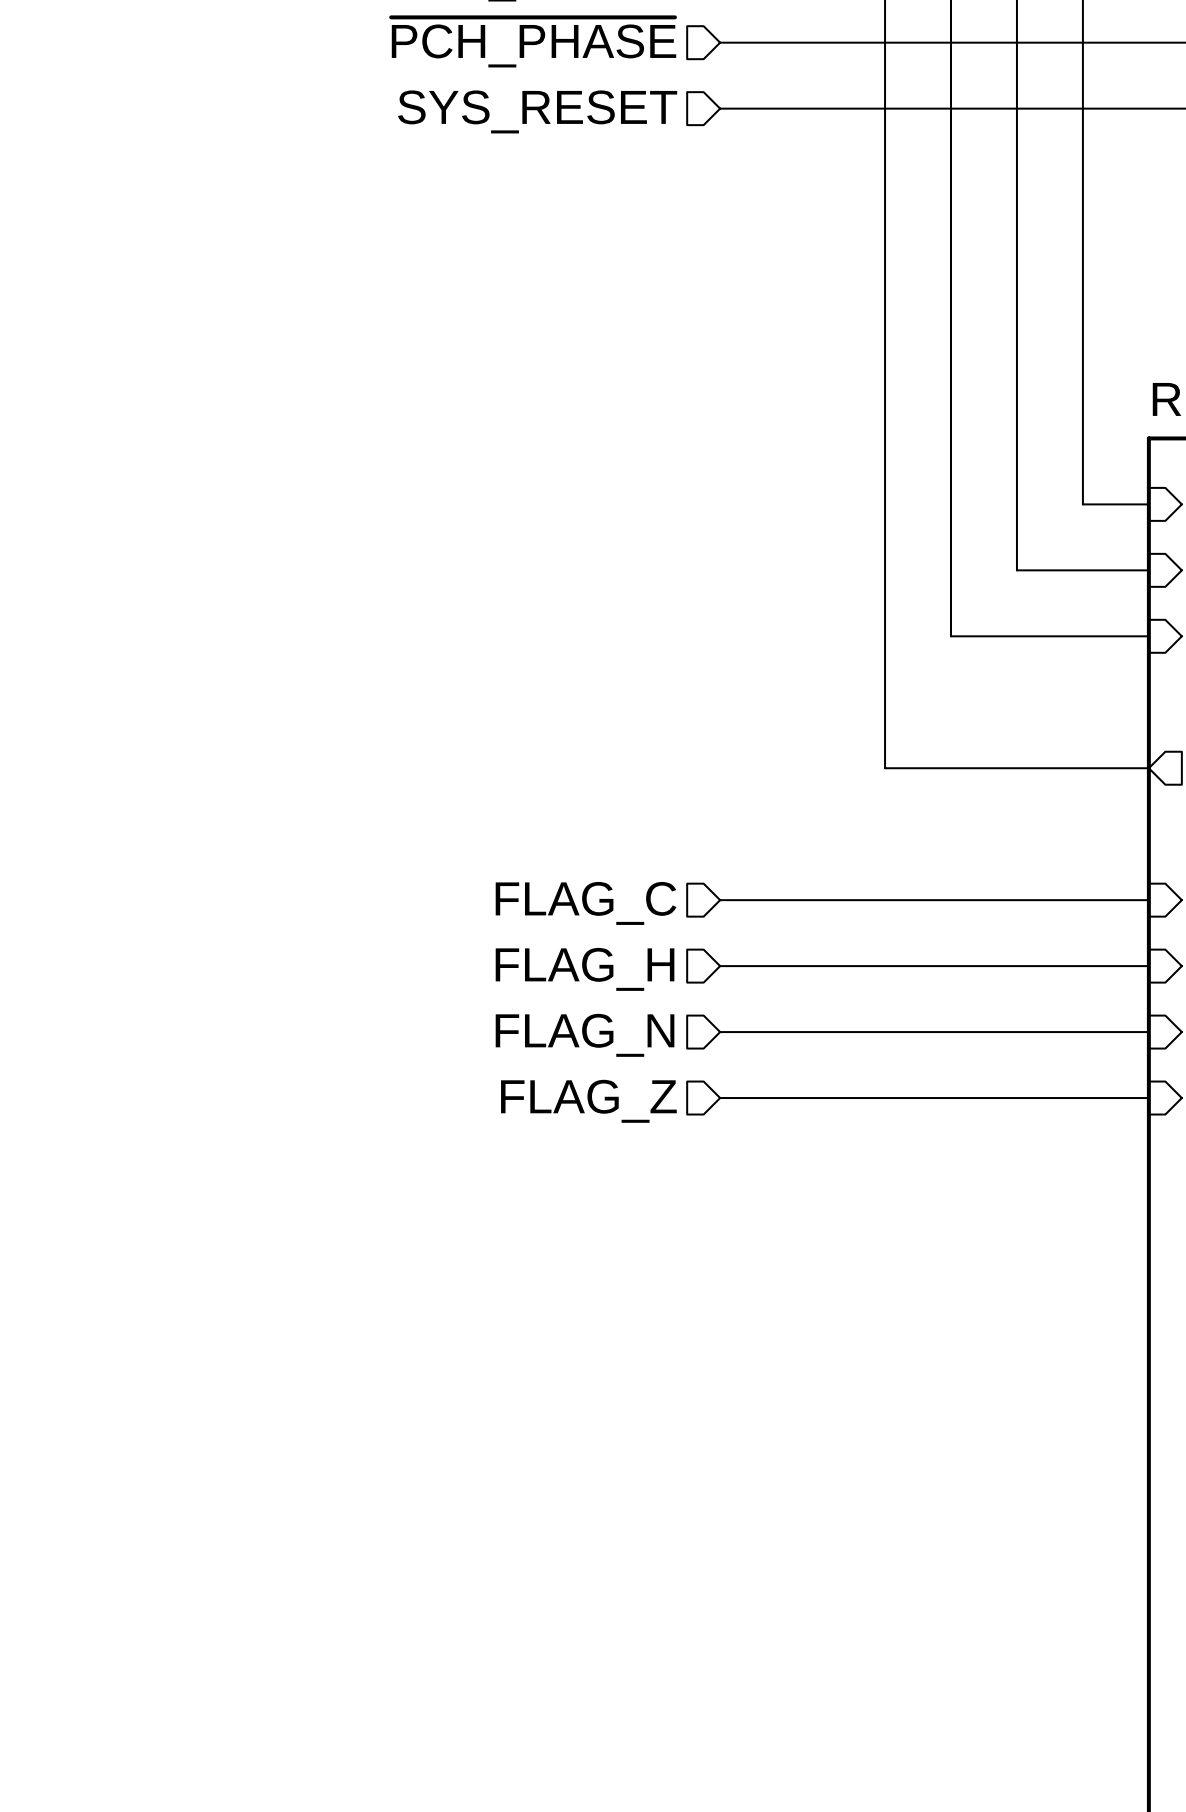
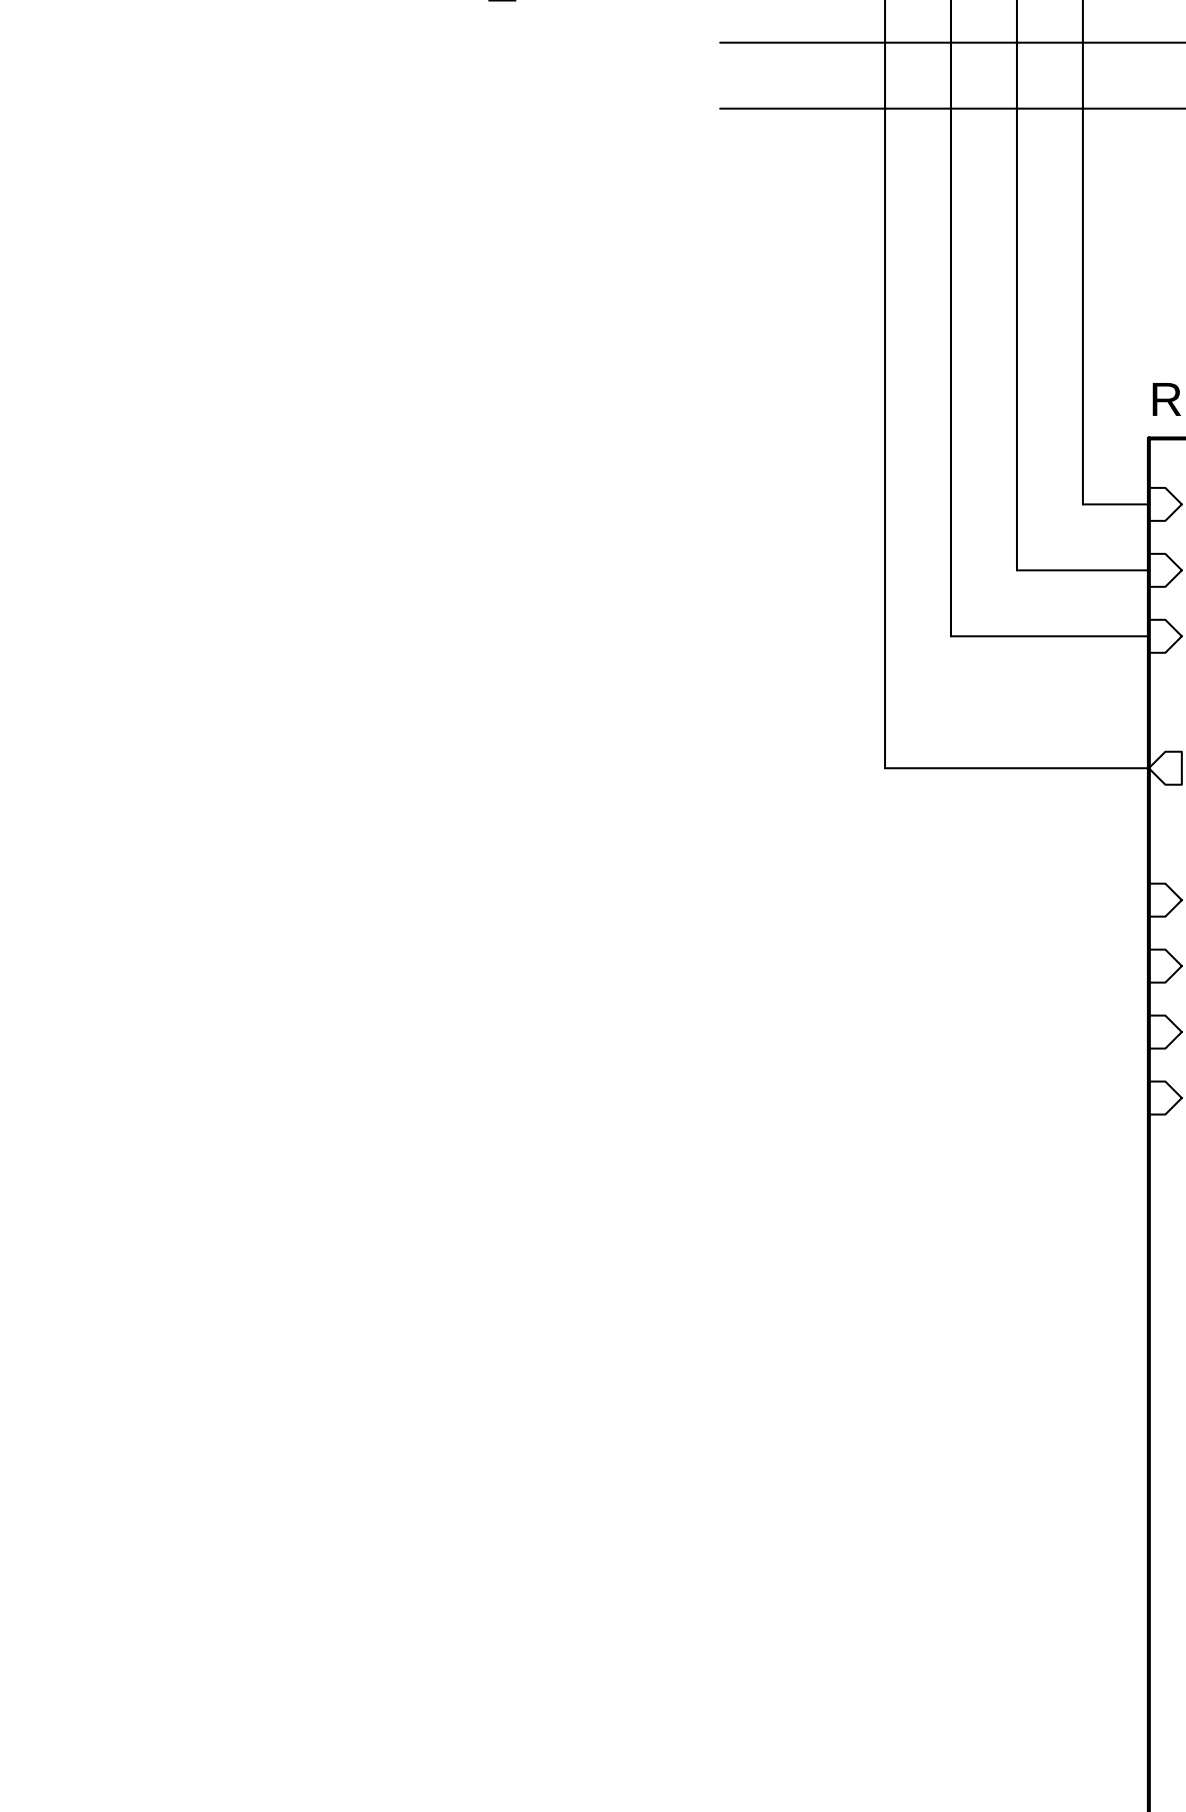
hierarchical label: ~{PCH_PHASE} (533, 42) -> none
hierarchical label: SYS_RESET (537, 111) -> none
wire: (720, 900) (1148, 900) -> none
hierarchical label: FLAG_C (586, 903) -> none
wire: (720, 966) (1148, 966) -> none
hierarchical label: FLAG_H (585, 969) -> none
wire: (720, 1032) (1148, 1032) -> none
hierarchical label: FLAG_N (585, 1035) -> none
wire: (720, 1098) (1148, 1098) -> none
hierarchical label: FLAG_Z (588, 1101) -> none

